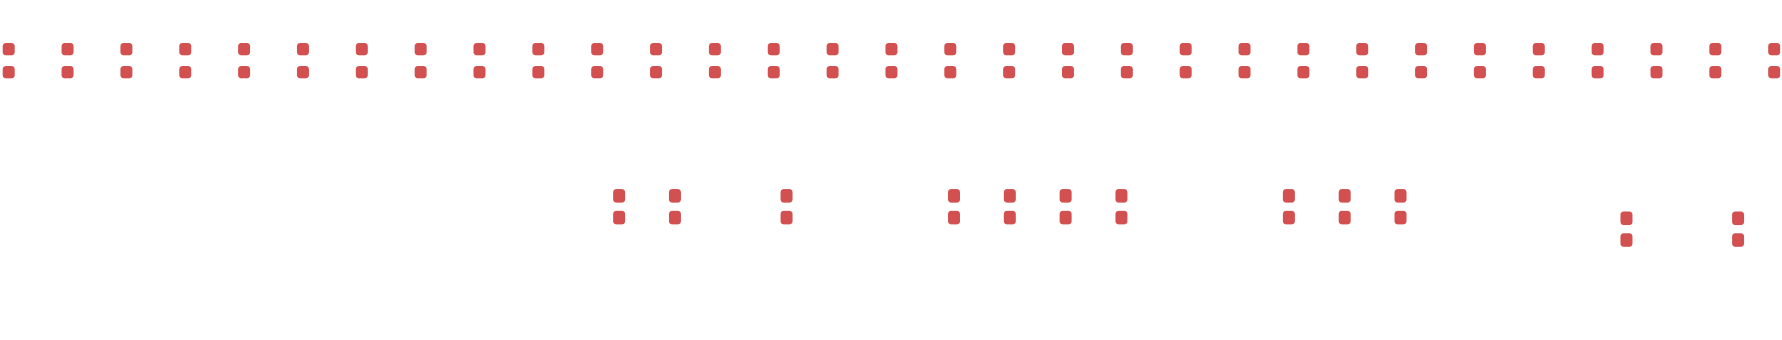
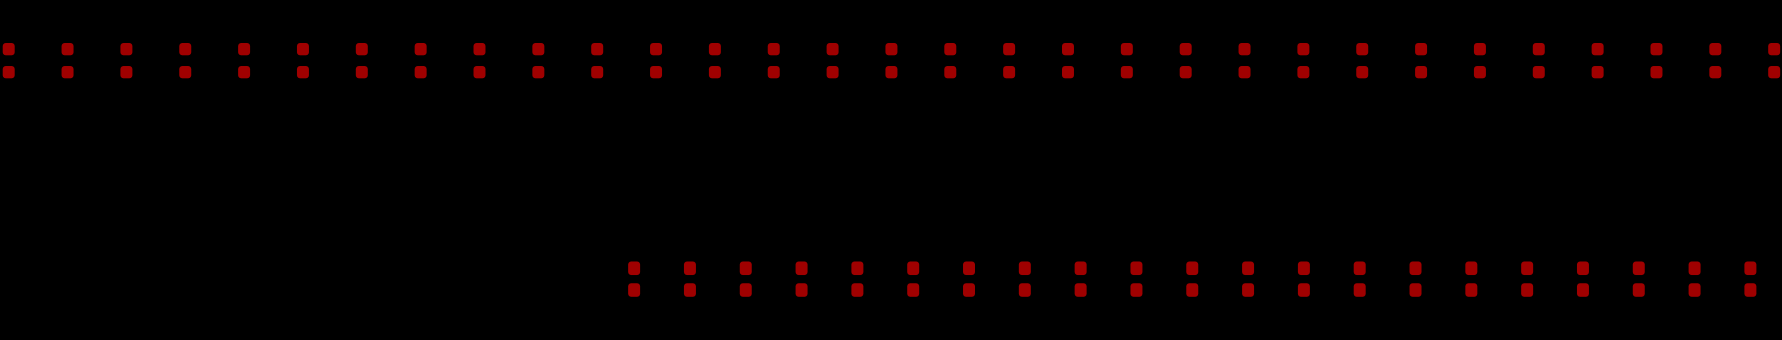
part: (619, 206) -> none
part: (674, 206) -> none
part: (786, 206) -> none
part: (954, 206) -> none
part: (1009, 206) -> none
part: (1065, 206) -> none
part: (1121, 206) -> none
part: (1288, 206) -> none
part: (1344, 206) -> none
part: (1400, 206) -> none
part: (1626, 229) -> none
part: (1738, 229) -> none
part: none -> (634, 279)
part: none -> (689, 279)
part: none -> (745, 279)
part: none -> (801, 279)
part: none -> (857, 279)
part: none -> (913, 279)
part: none -> (969, 279)
part: none -> (1024, 279)
part: none -> (1080, 279)
part: none -> (1136, 279)
part: none -> (1192, 279)
part: none -> (1248, 279)
part: none -> (1303, 279)
part: none -> (1359, 279)
part: none -> (1415, 279)
part: none -> (1471, 279)
part: none -> (1527, 279)
part: none -> (1582, 279)
part: none -> (1638, 279)
part: none -> (1694, 279)
part: none -> (1750, 279)

